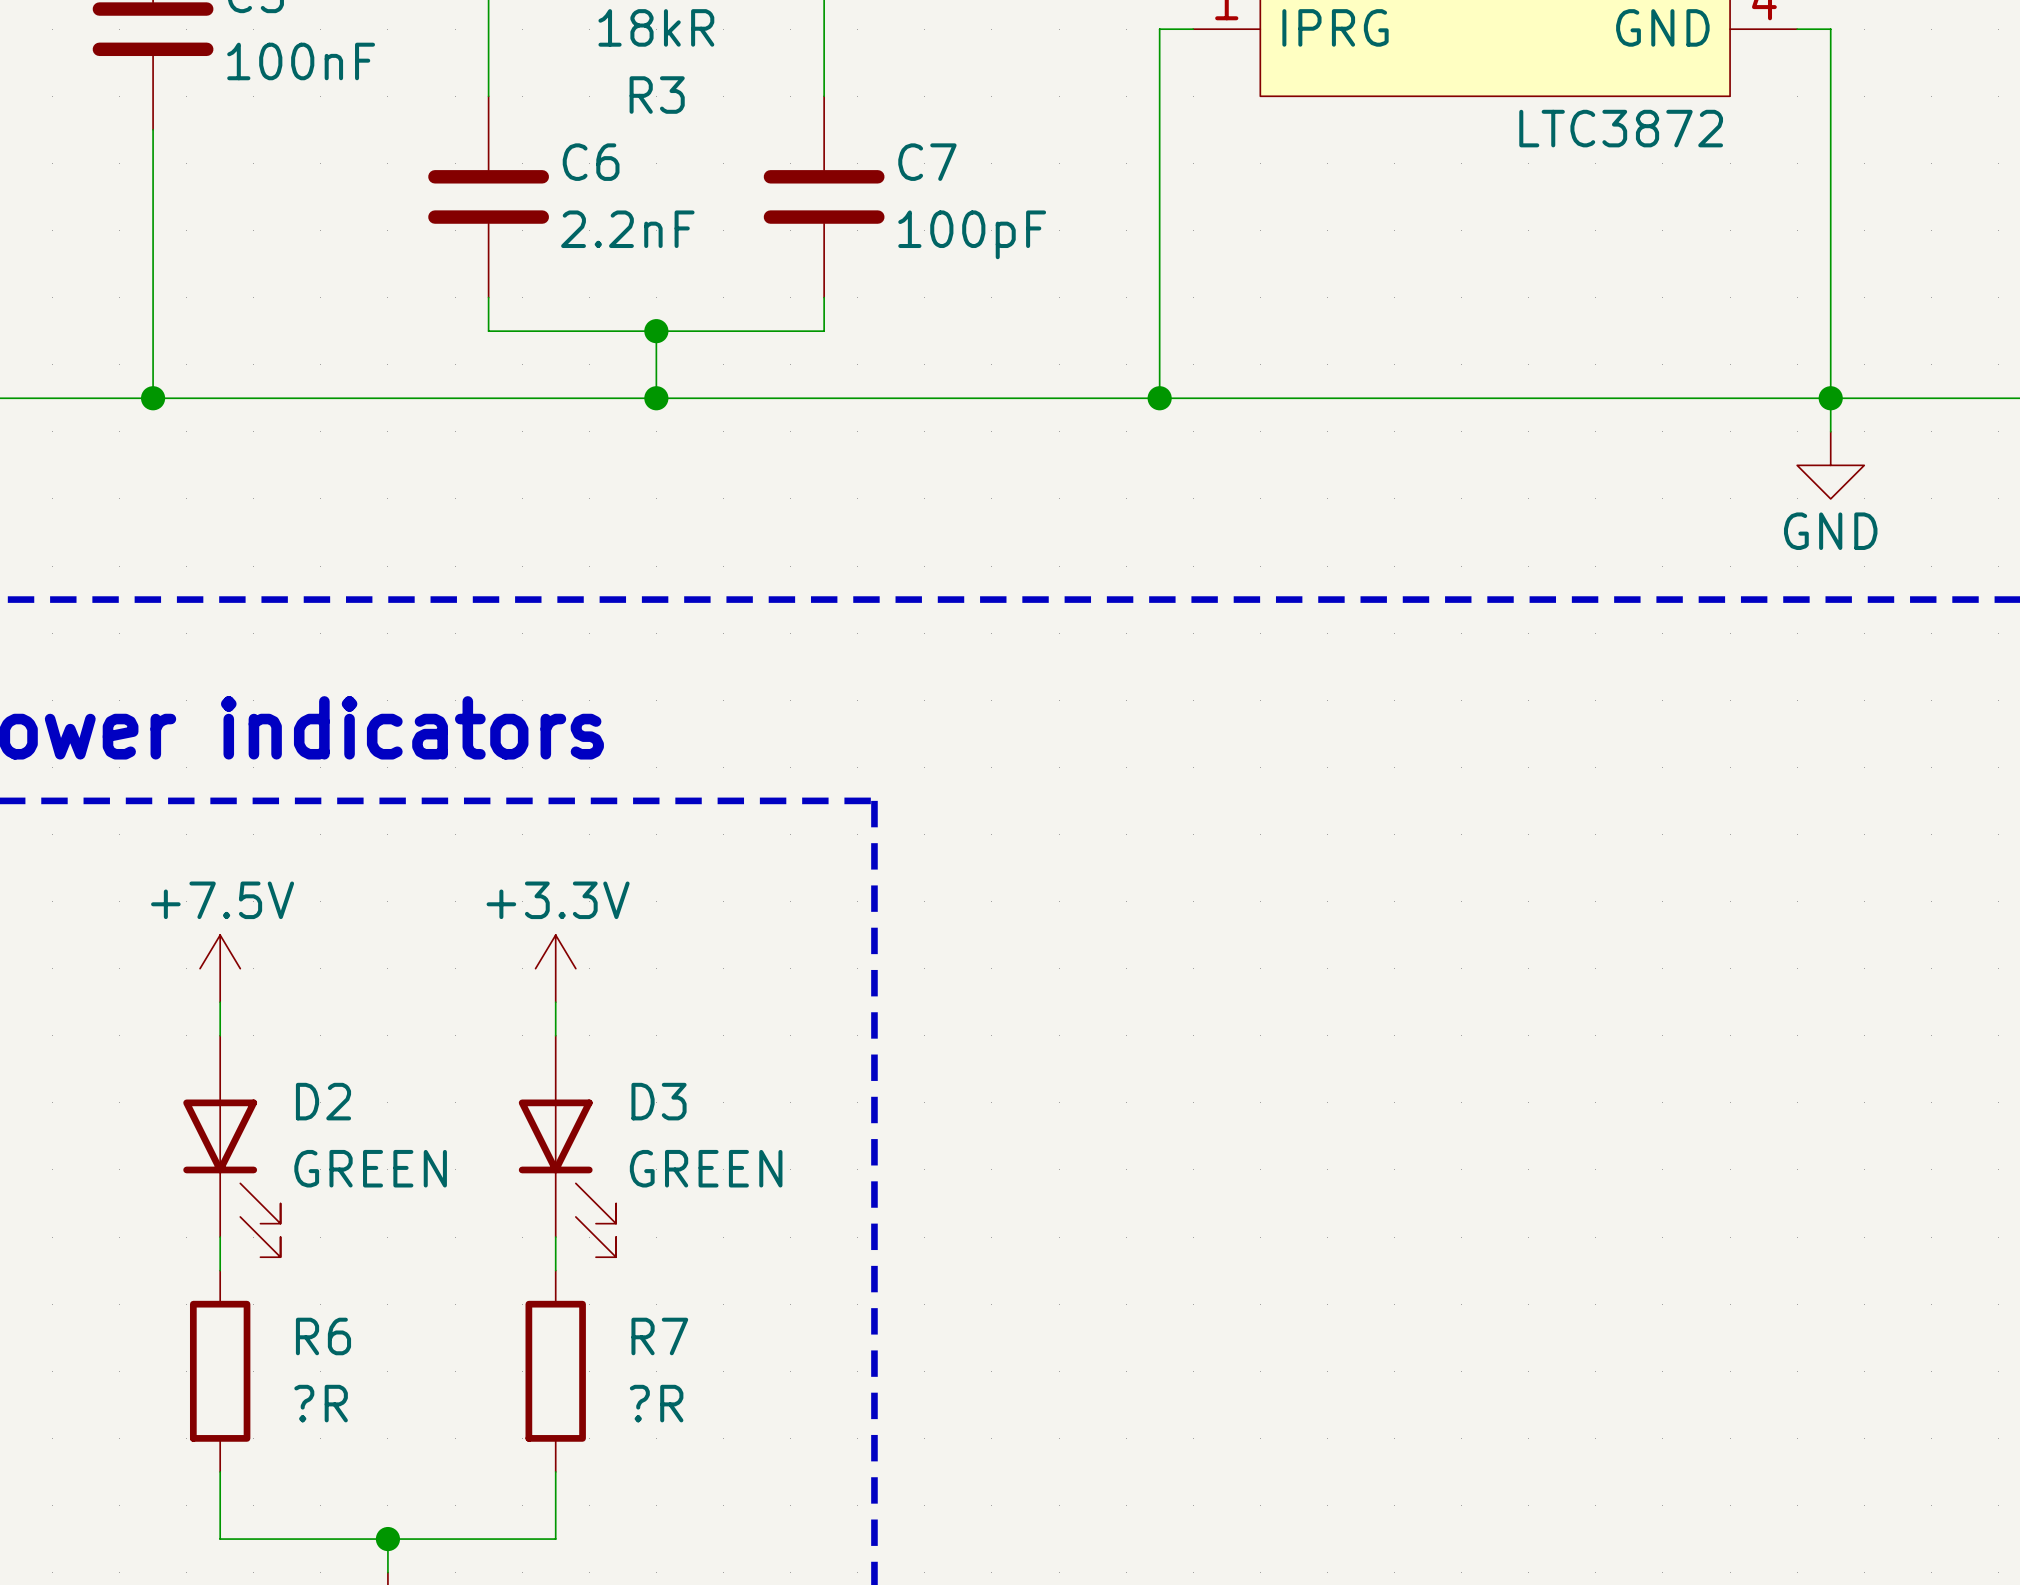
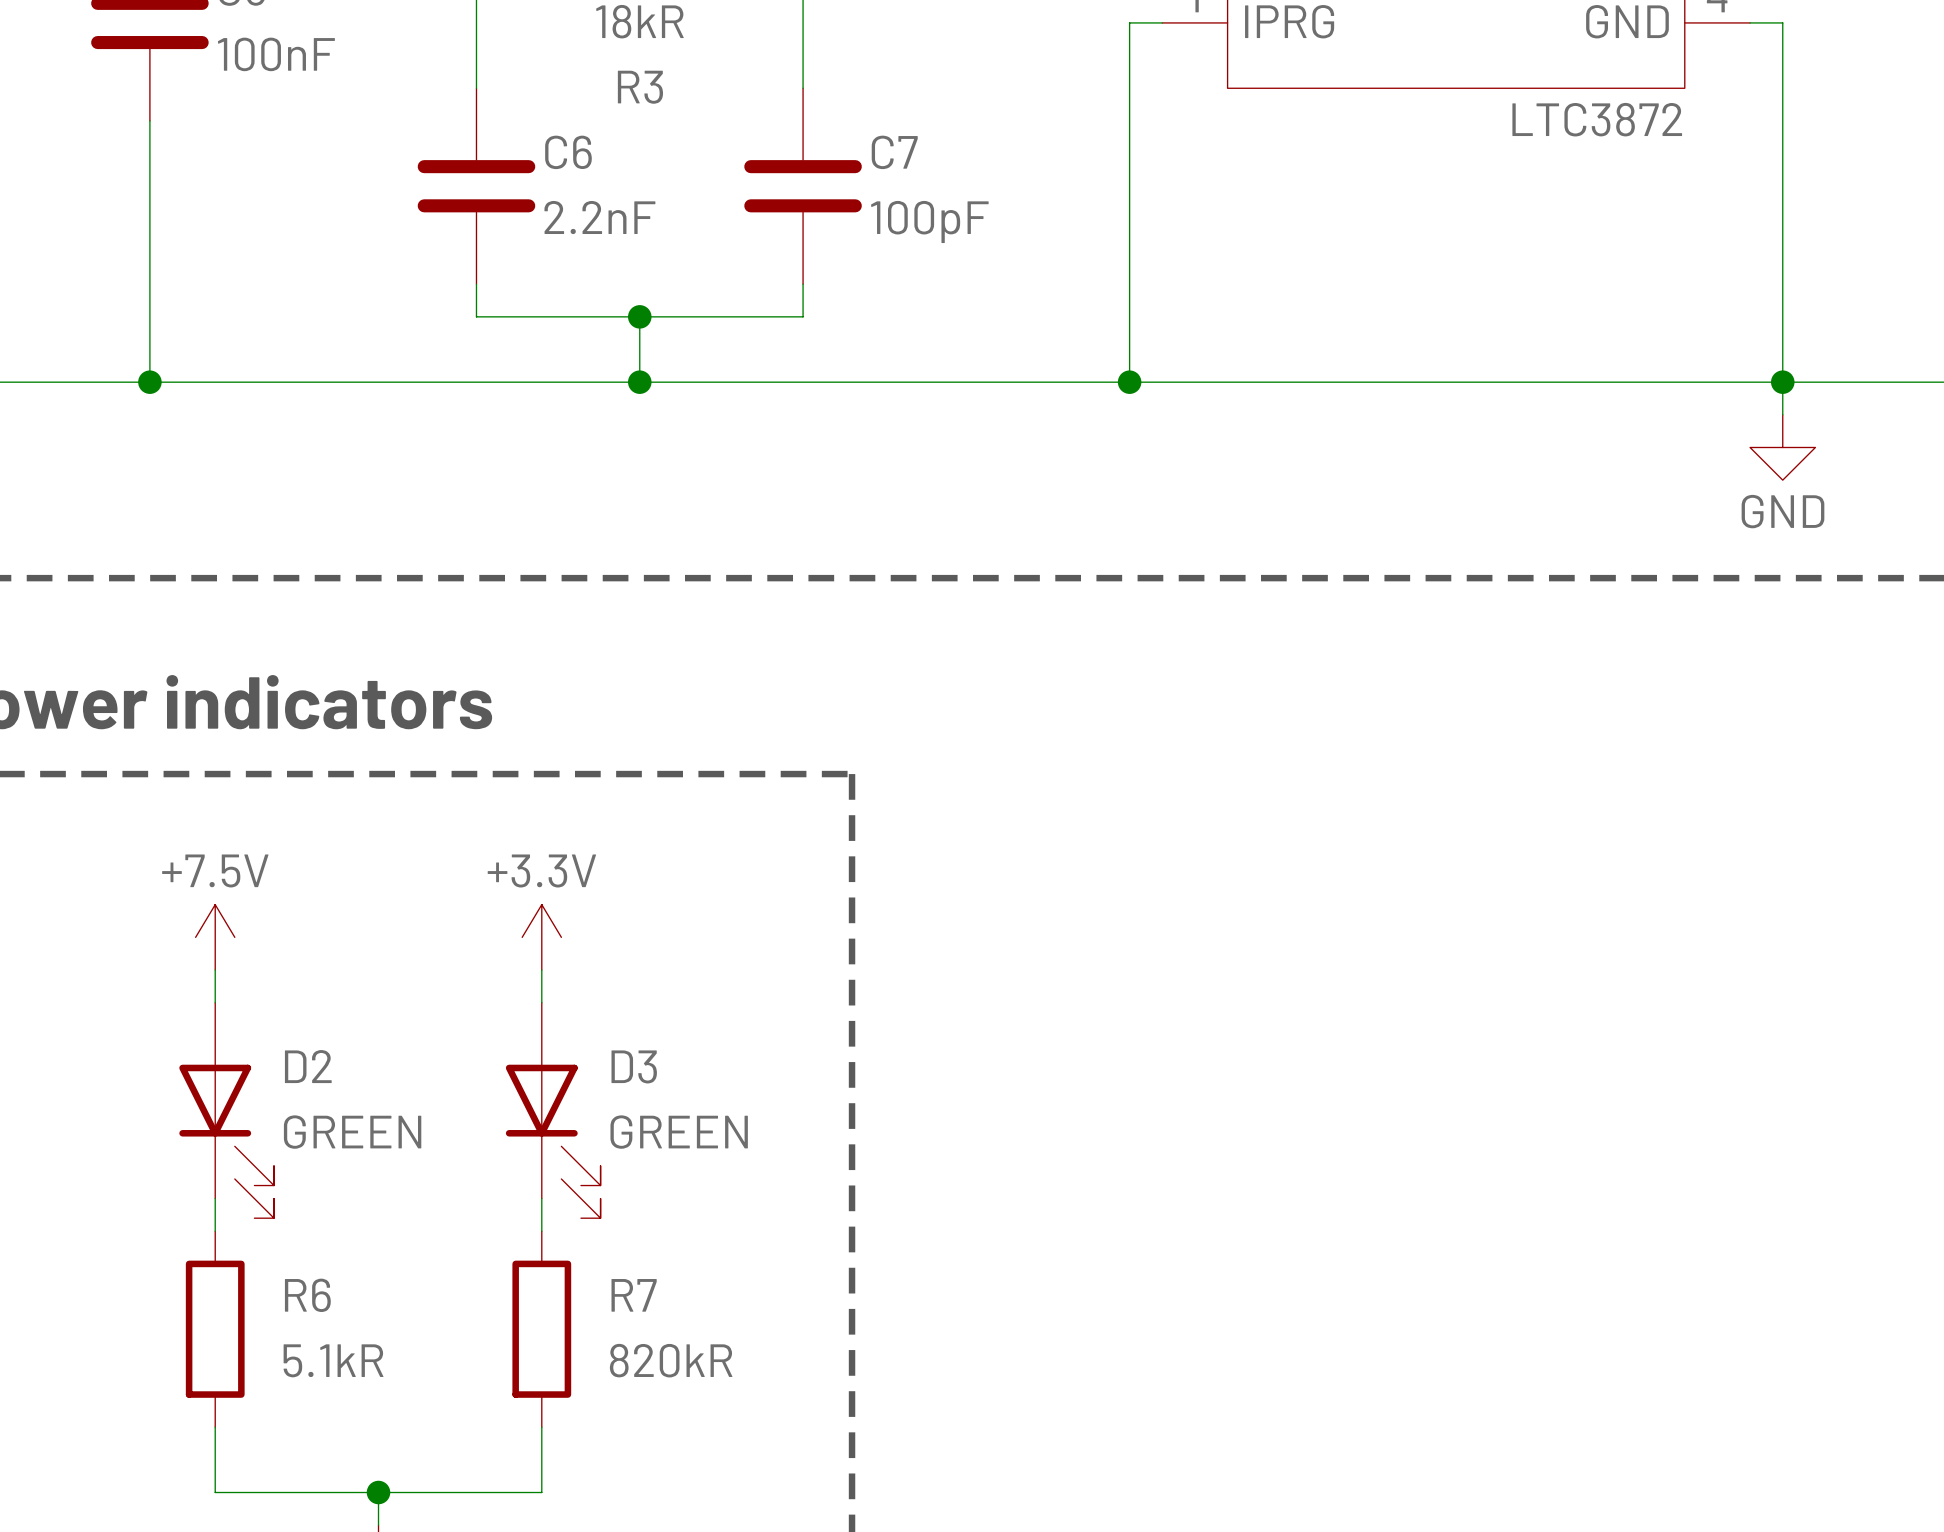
R6 value: ?R (321, 1403) -> 5.1kR (333, 1360)
R7 value: ?R (656, 1403) -> 820kR (671, 1360)

